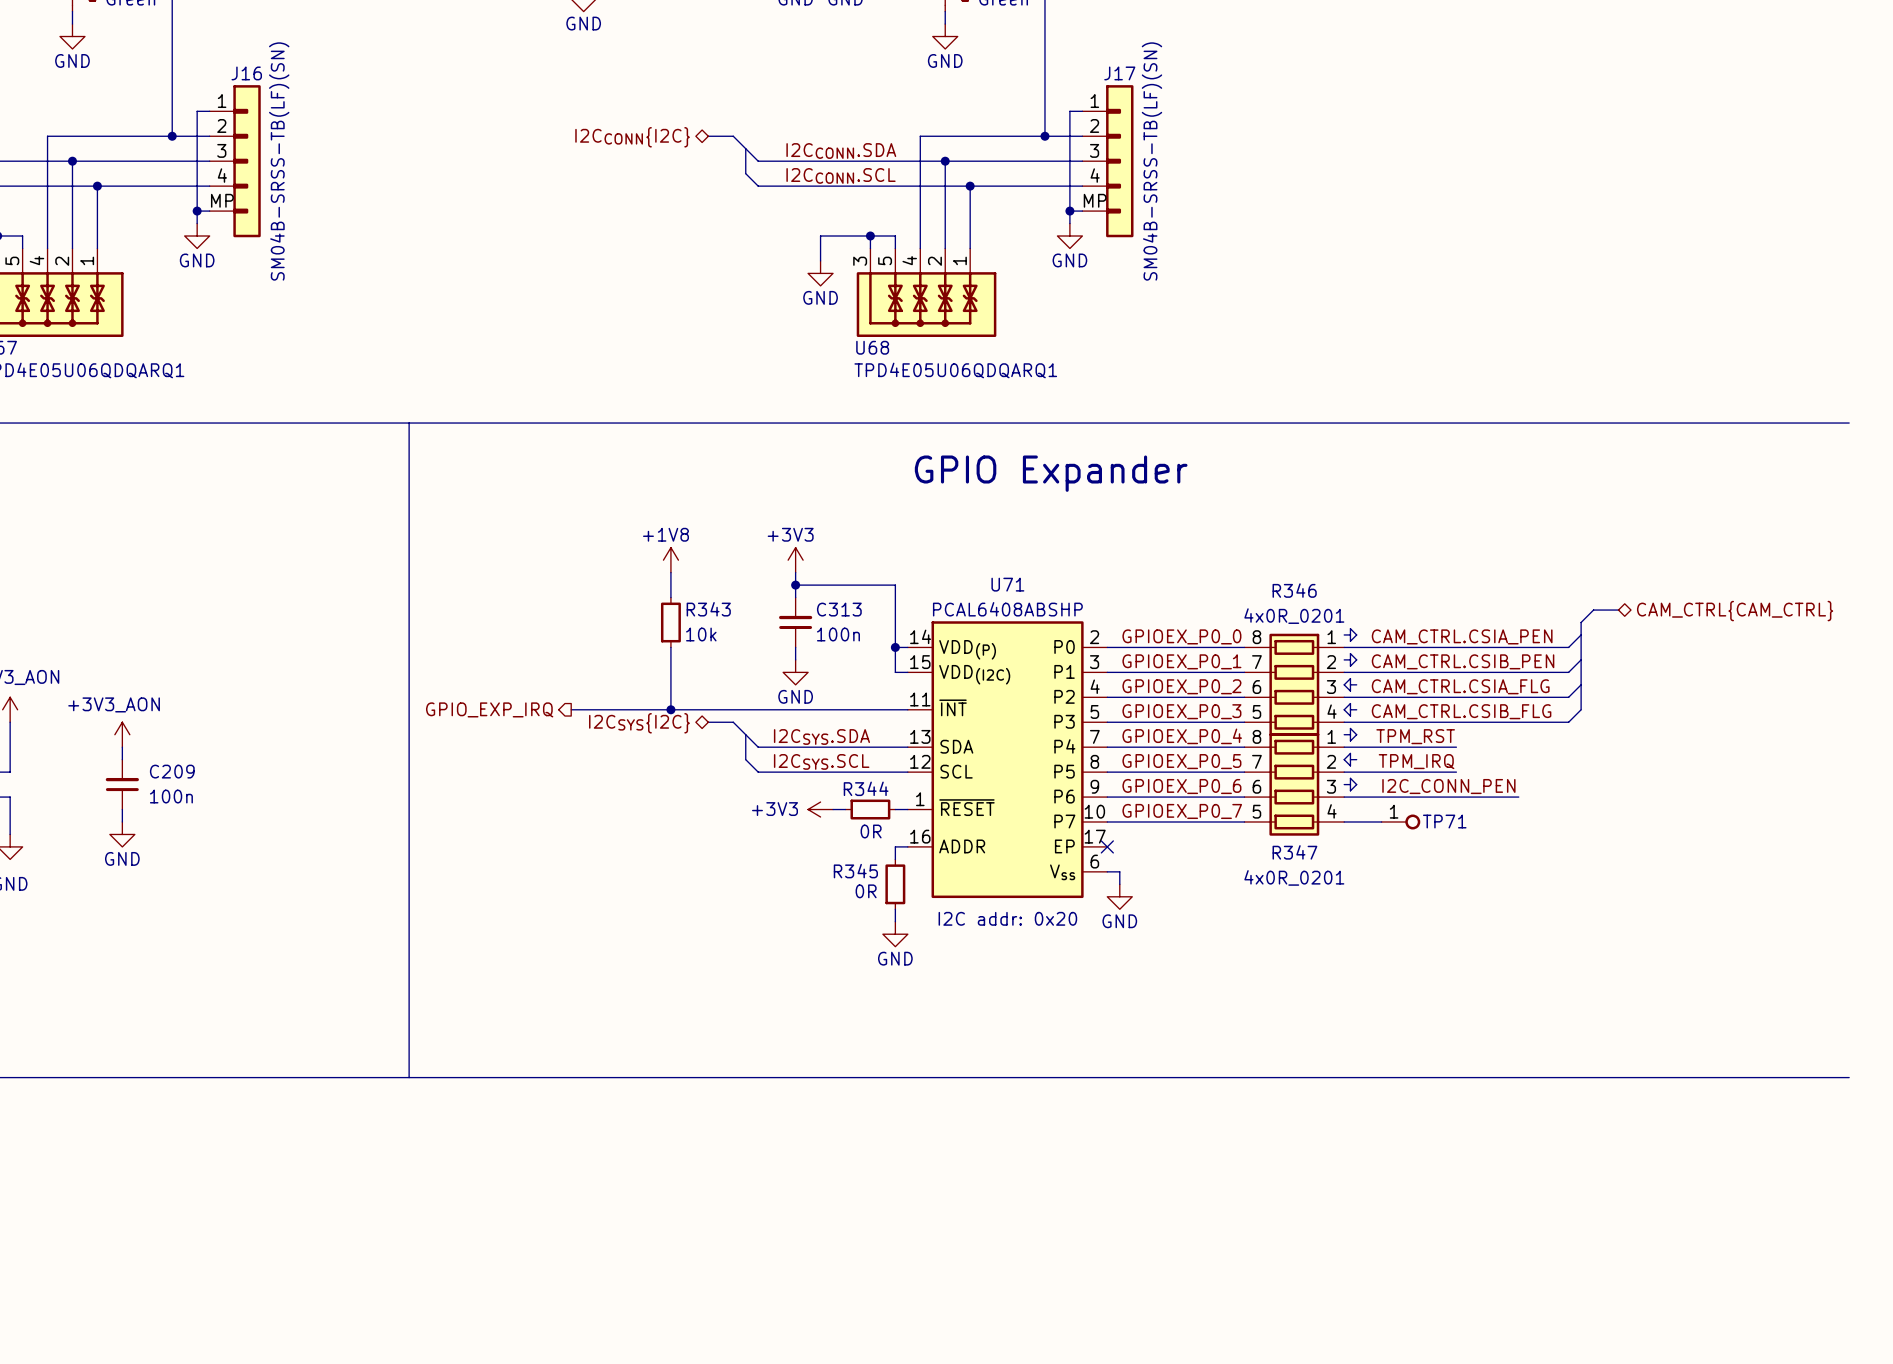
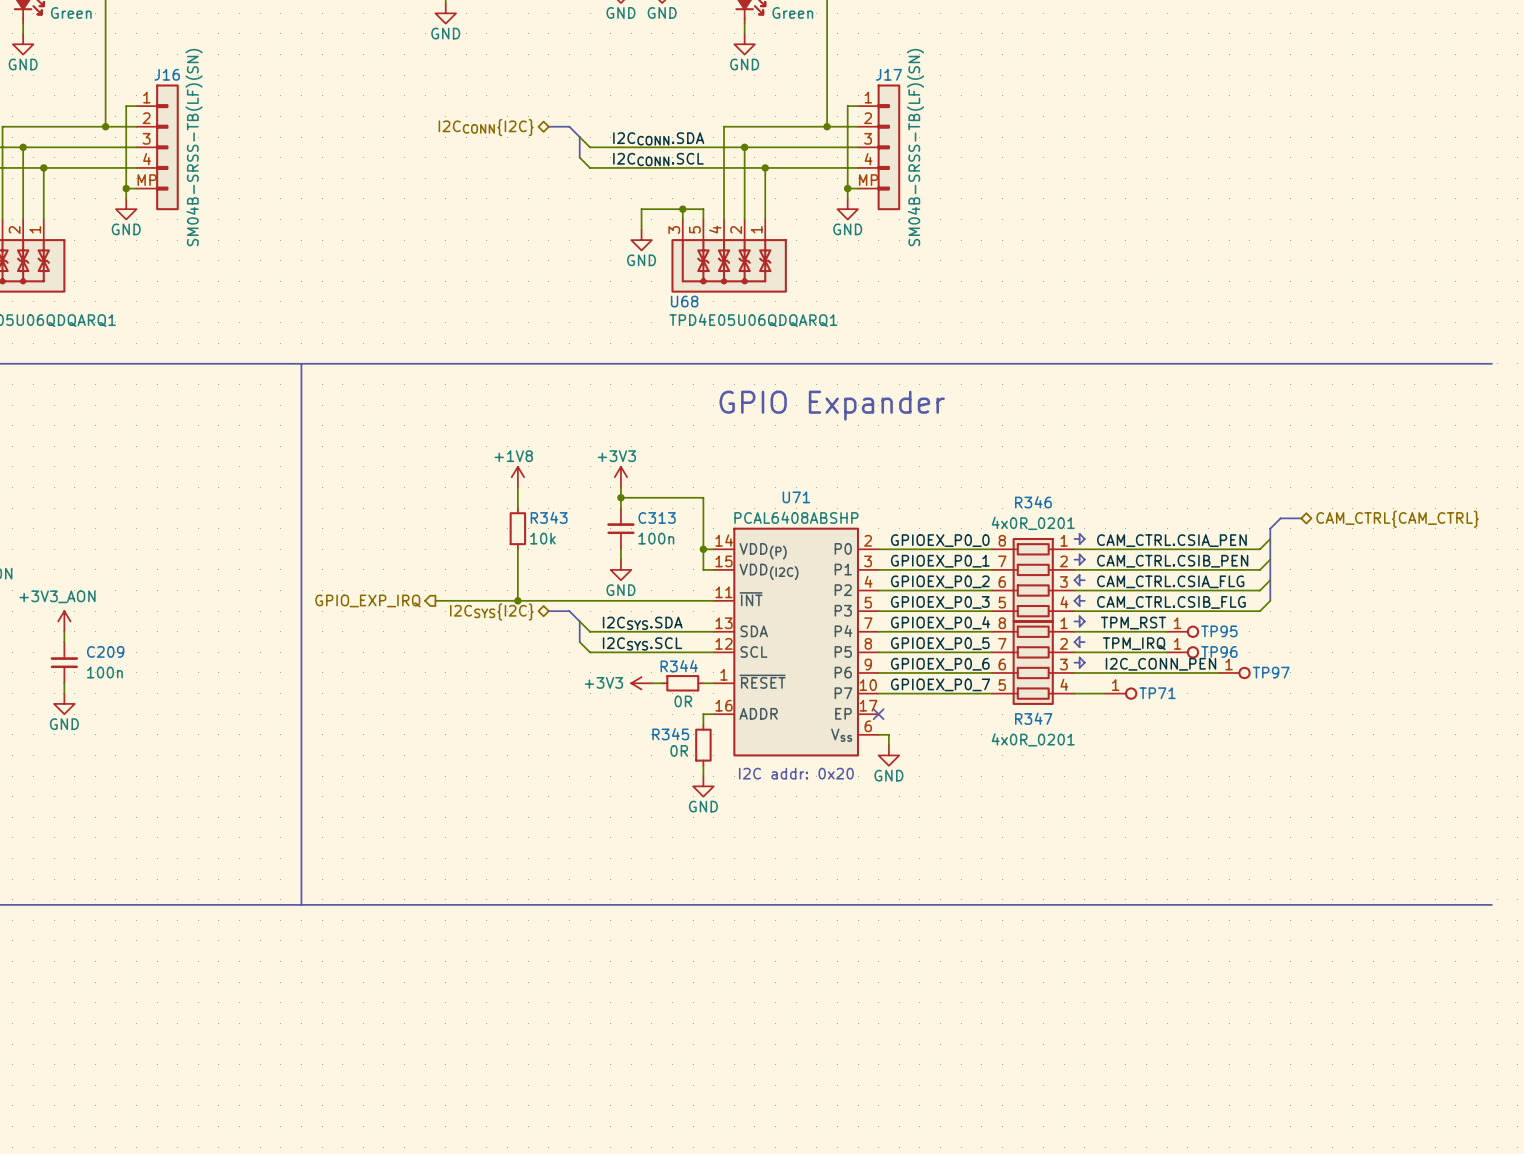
TP95: none -> (1183, 631)
TP96: none -> (1183, 652)
TP97: none -> (1234, 672)

